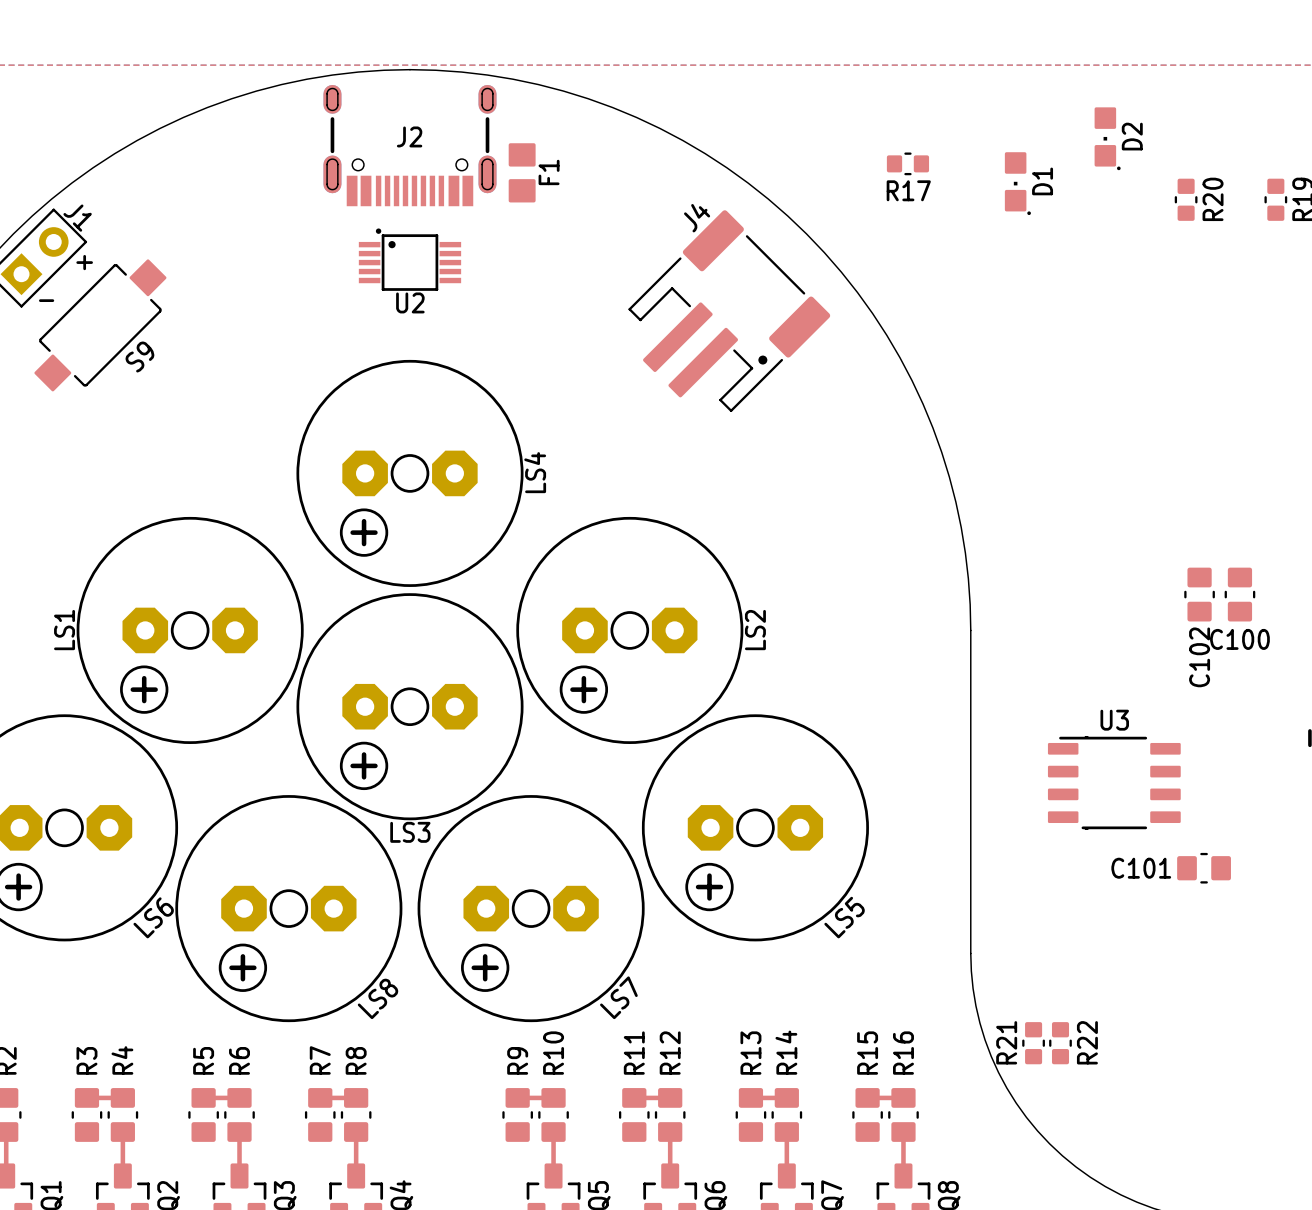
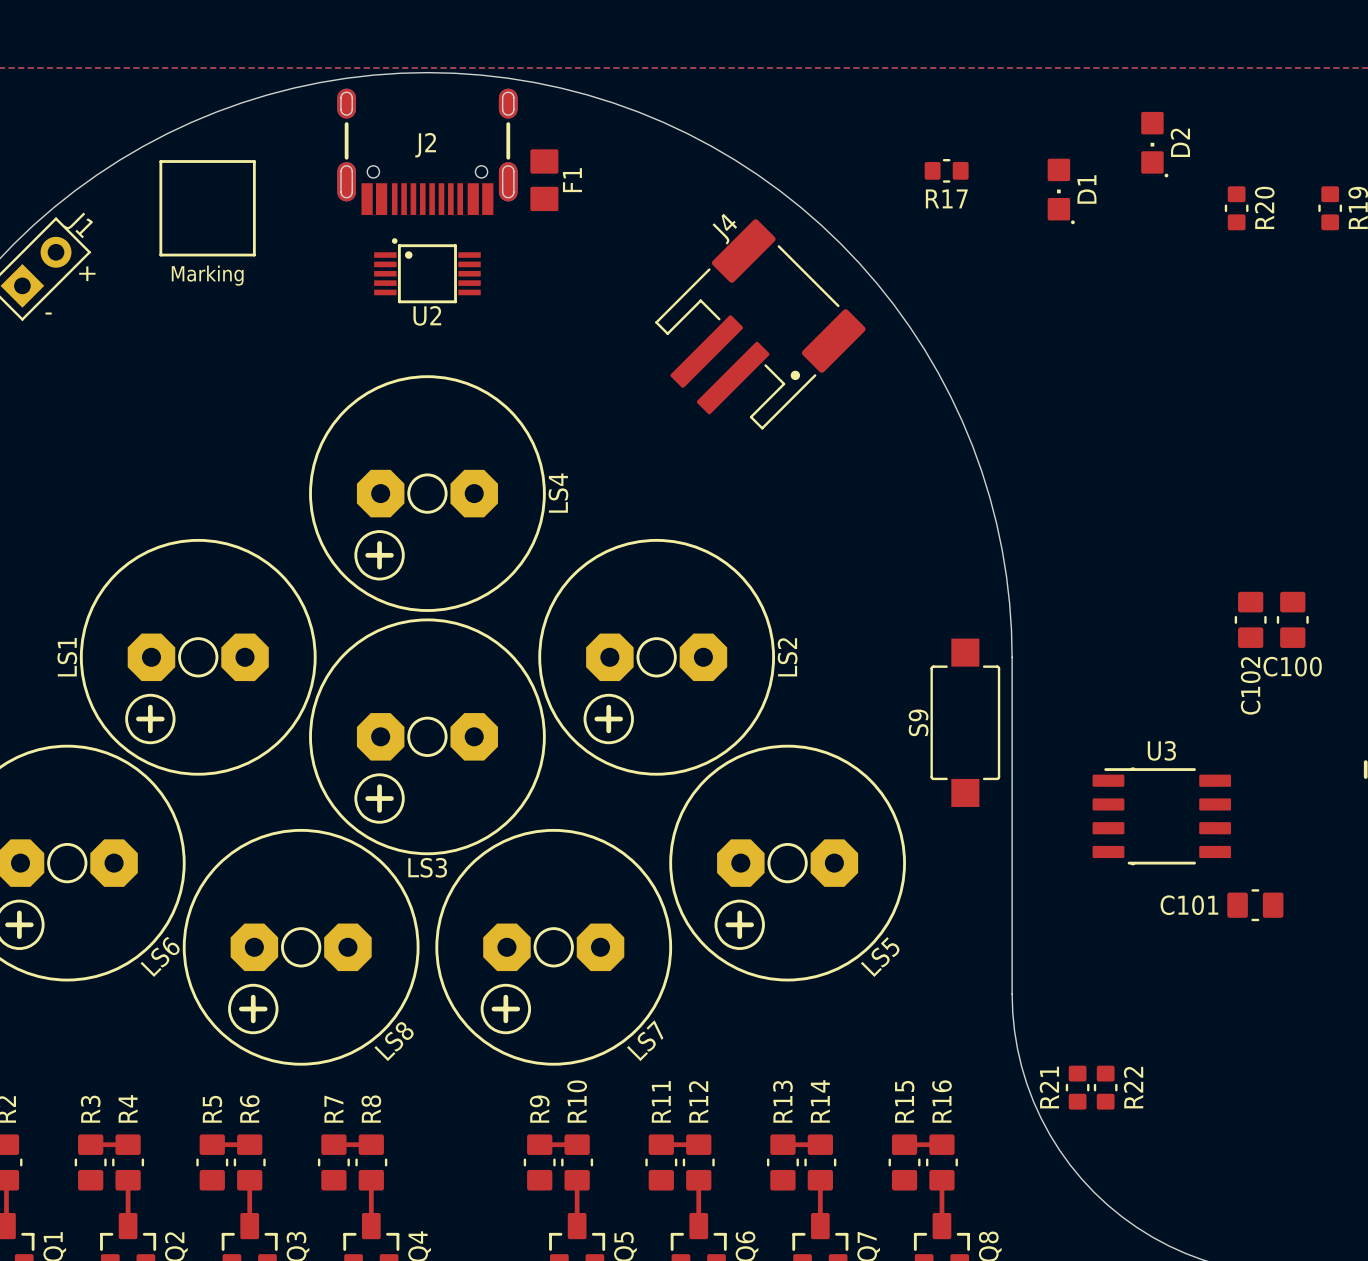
drawing: none -> [159, 160, 256, 257]
S9 footprint: [34, 259, 167, 392] -> [930, 638, 1001, 807]
S9 name position: S9 (139, 357) -> S9 (918, 722)

